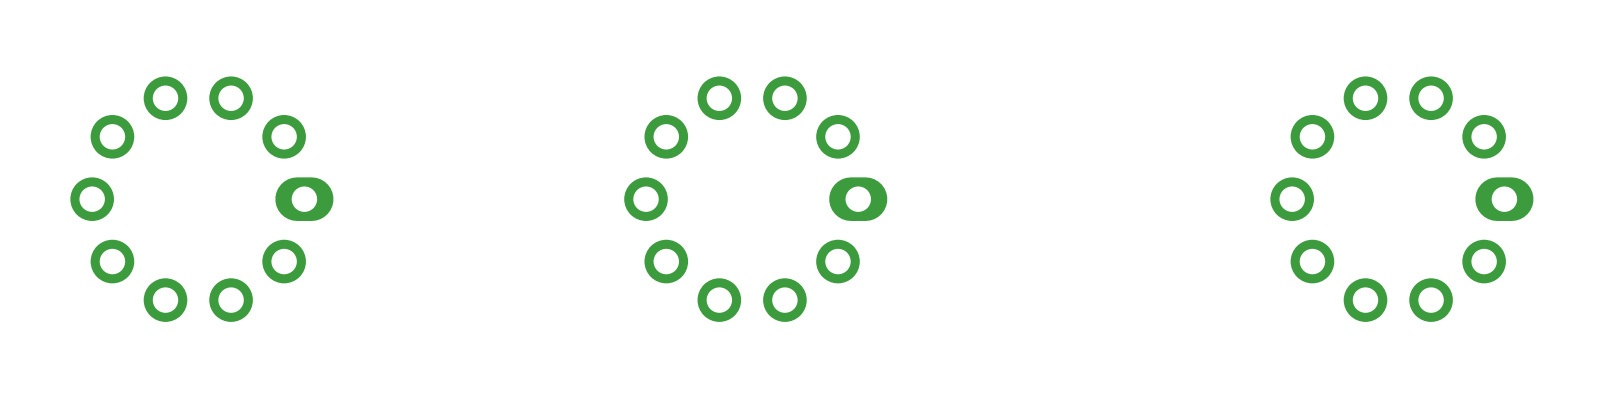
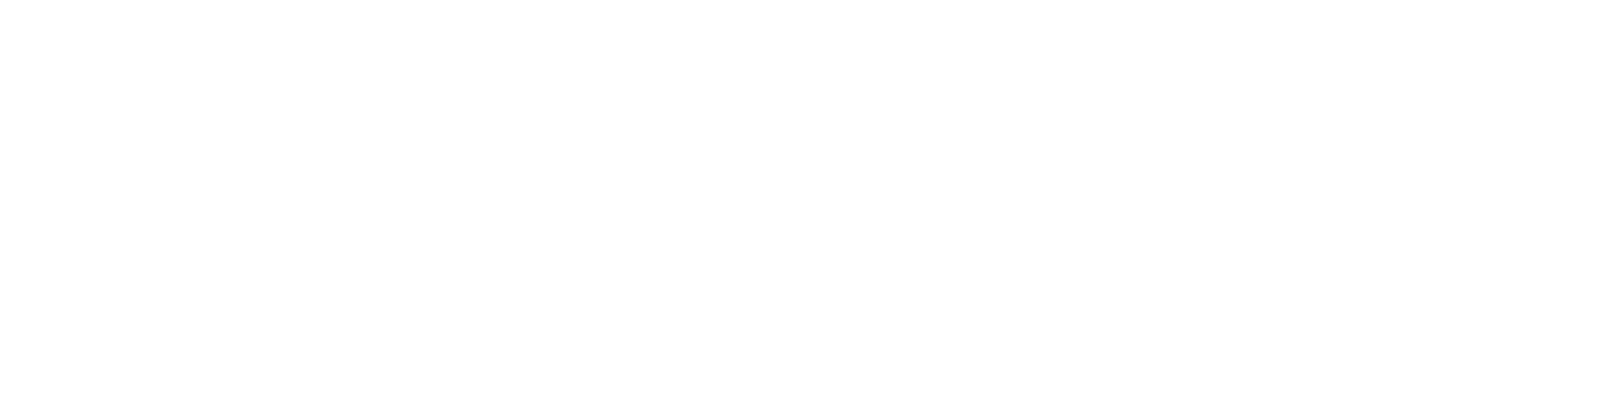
part: (201, 199) -> none
part: (755, 199) -> none
part: (1401, 199) -> none

